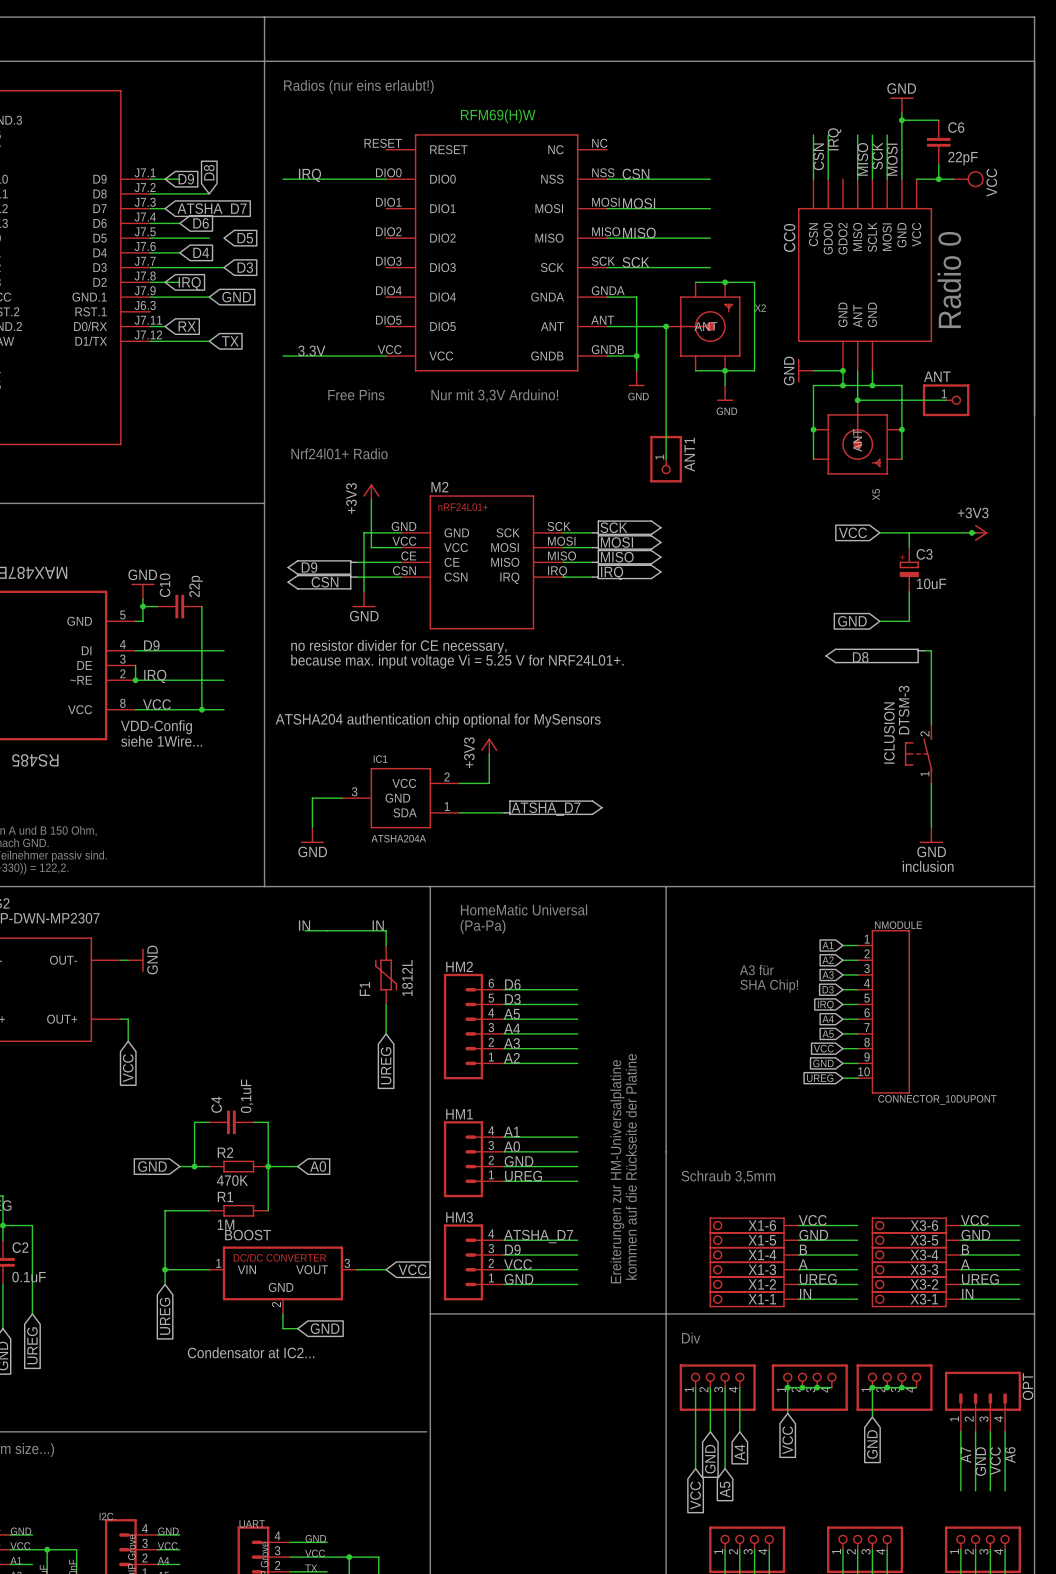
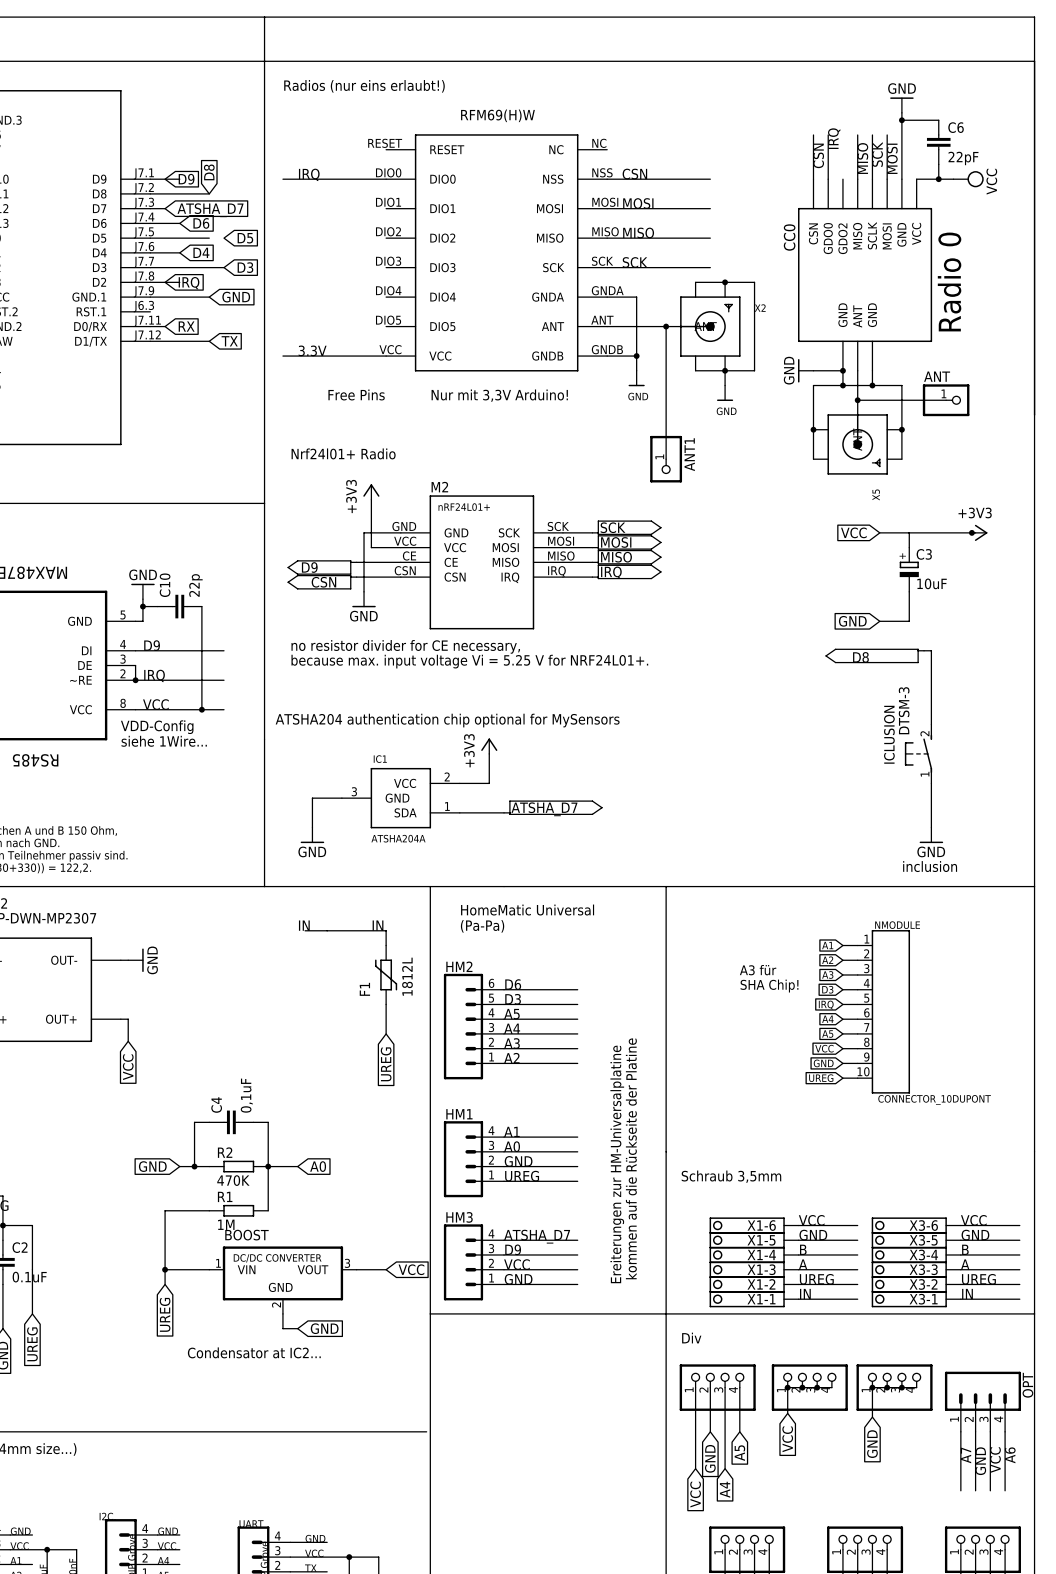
global label: A4 (739, 1452) -> A5 (739, 1453)
global label: A5 (725, 1489) -> A4 (725, 1489)

